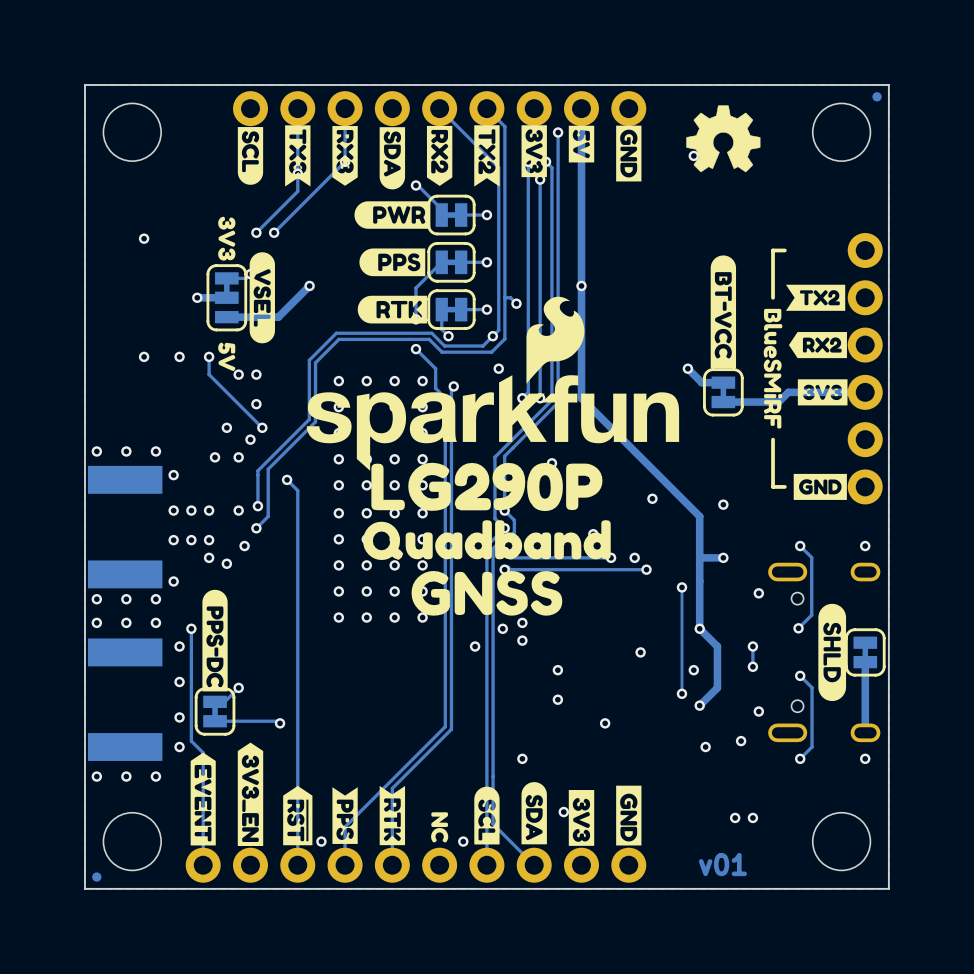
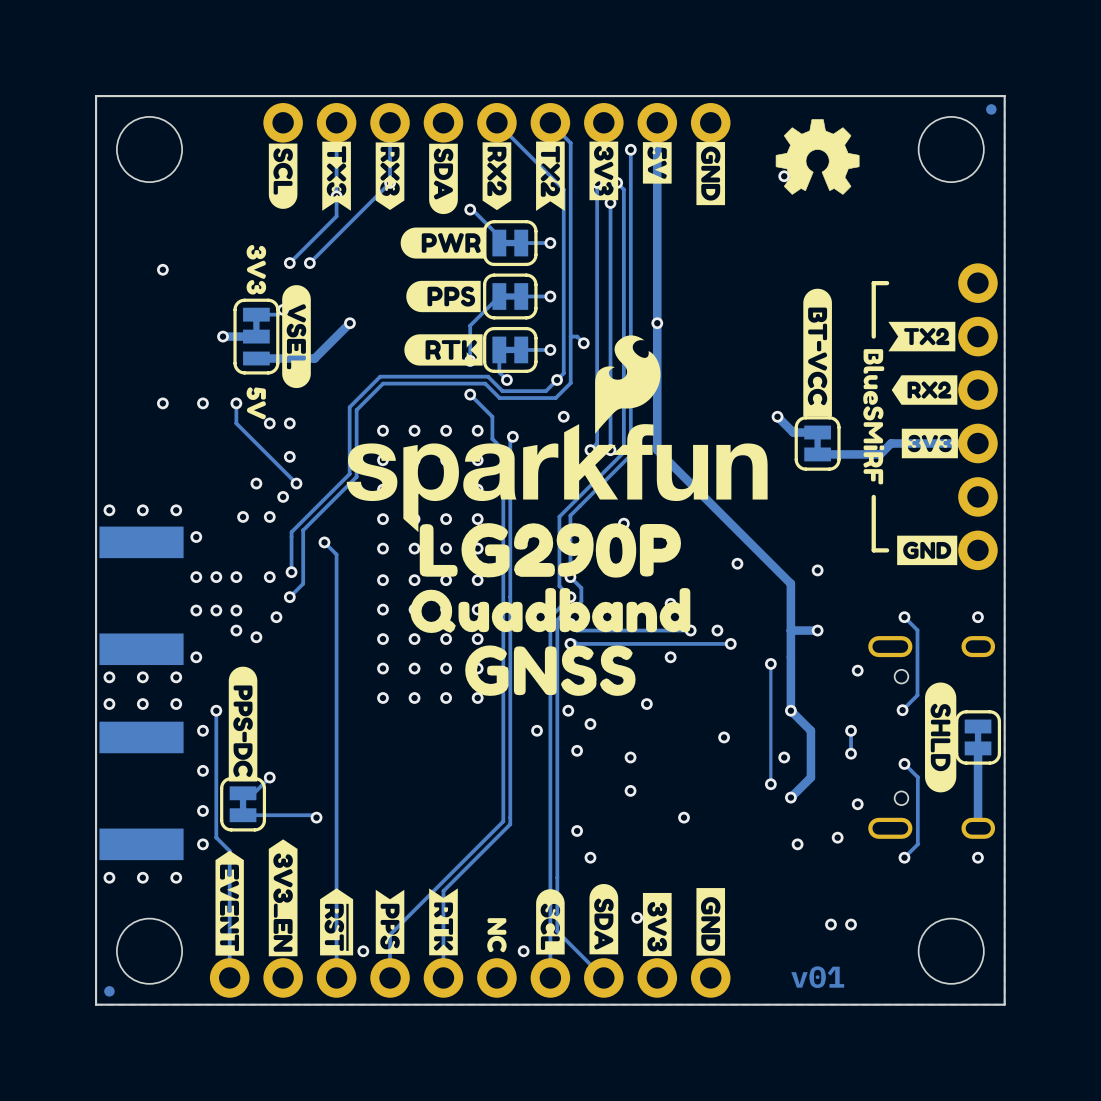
via: none -> (670, 657)
via: (522, 622) -> none
via: none -> (646, 704)
via: none -> (577, 750)
via: none -> (577, 830)

